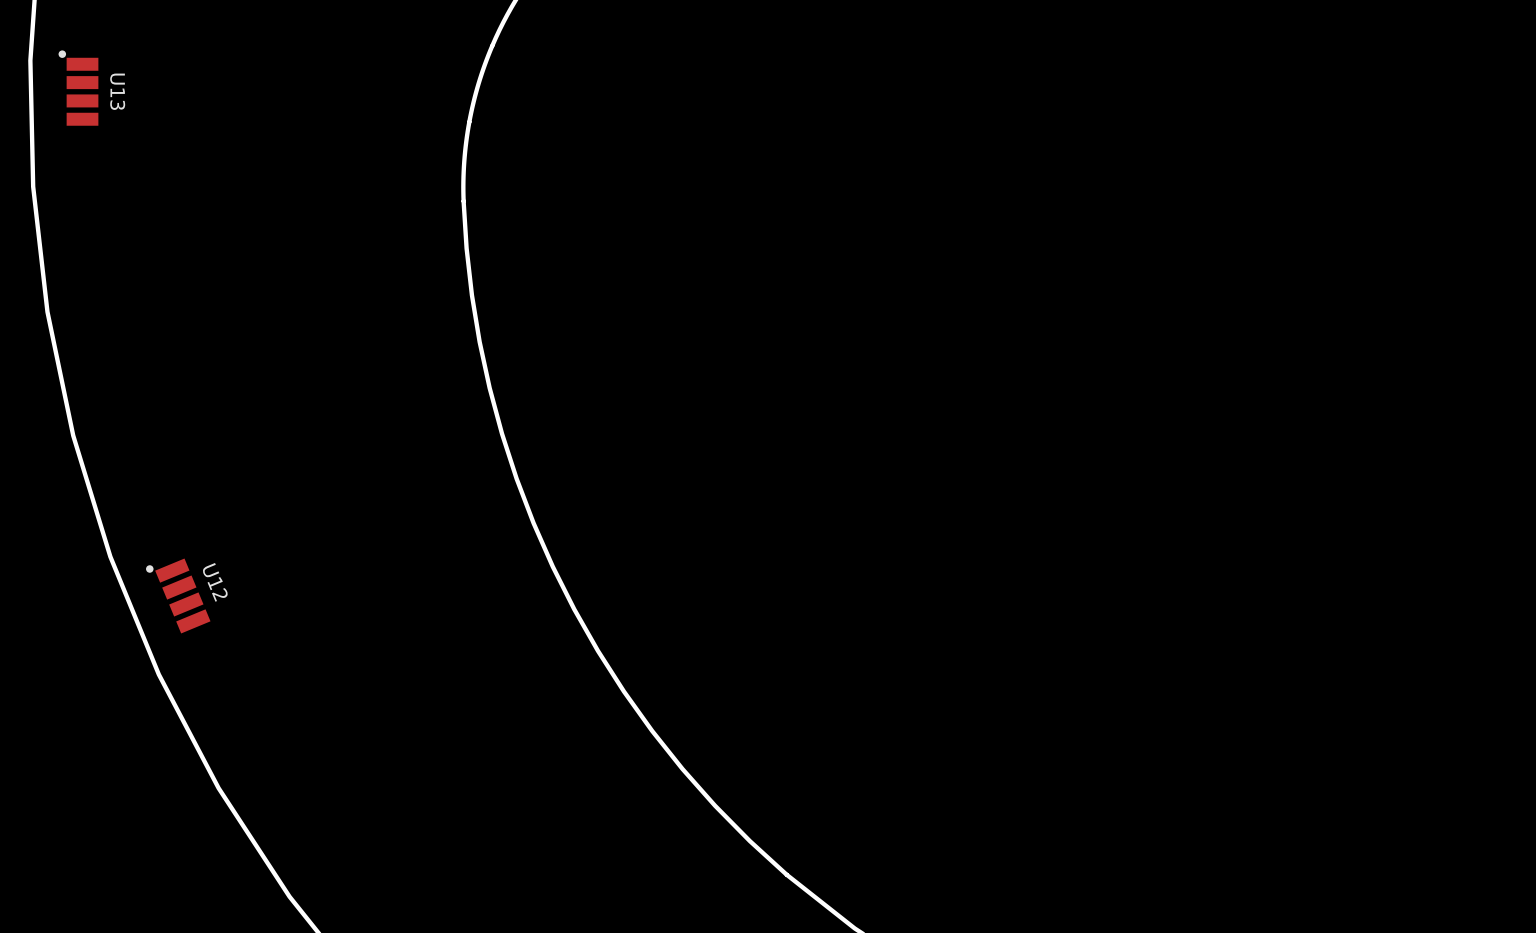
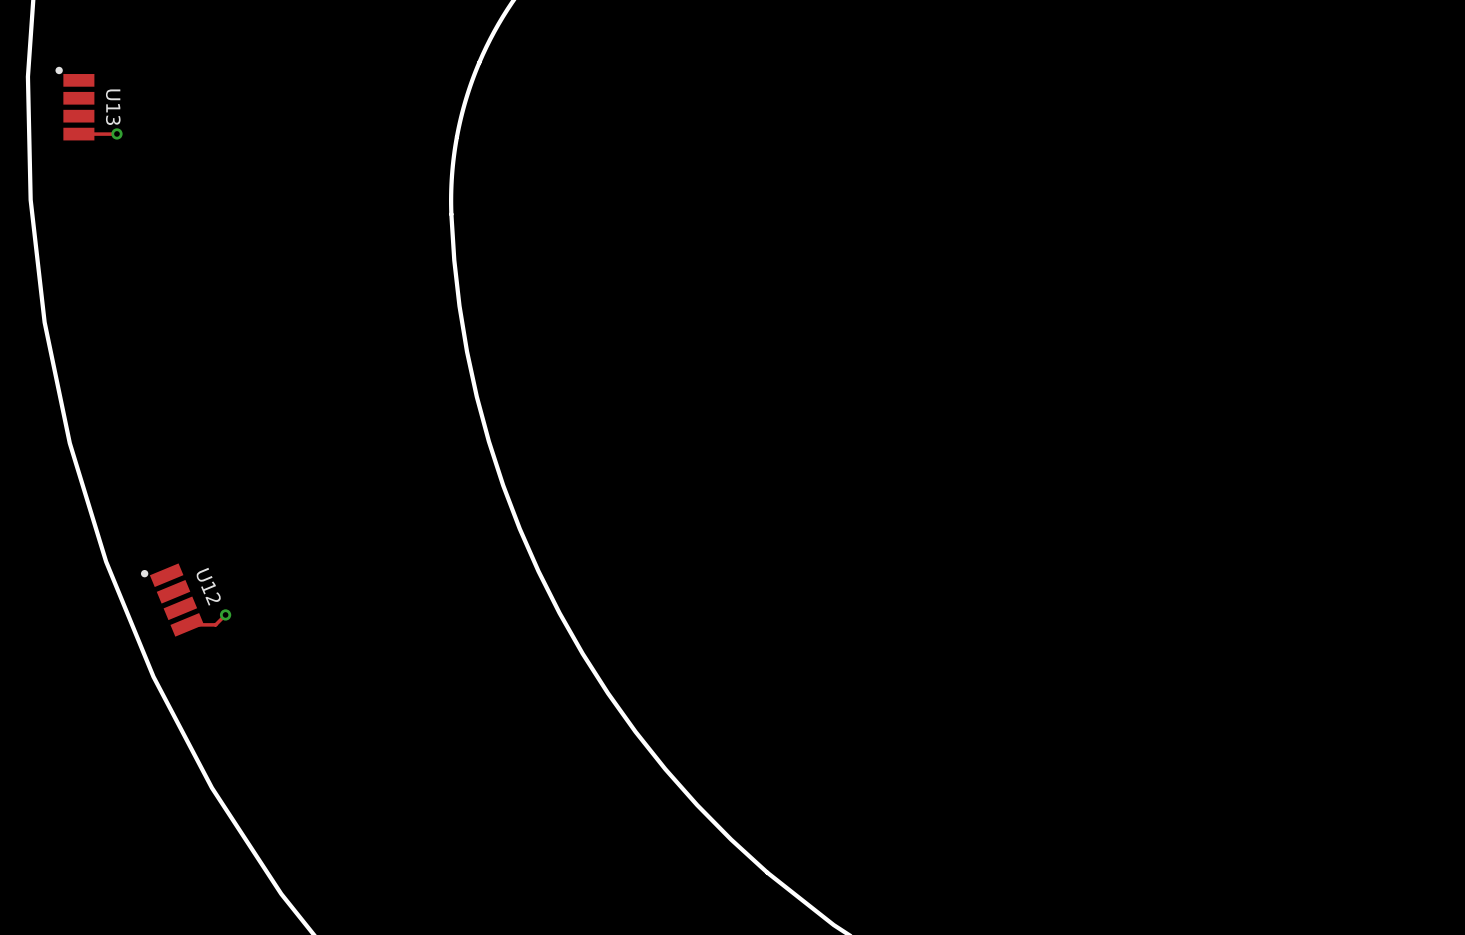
track: none -> (78, 134) (116, 134)
via: none -> (116, 133)
track: none -> (225, 614) (215, 624) (187, 624)
via: none -> (225, 614)

